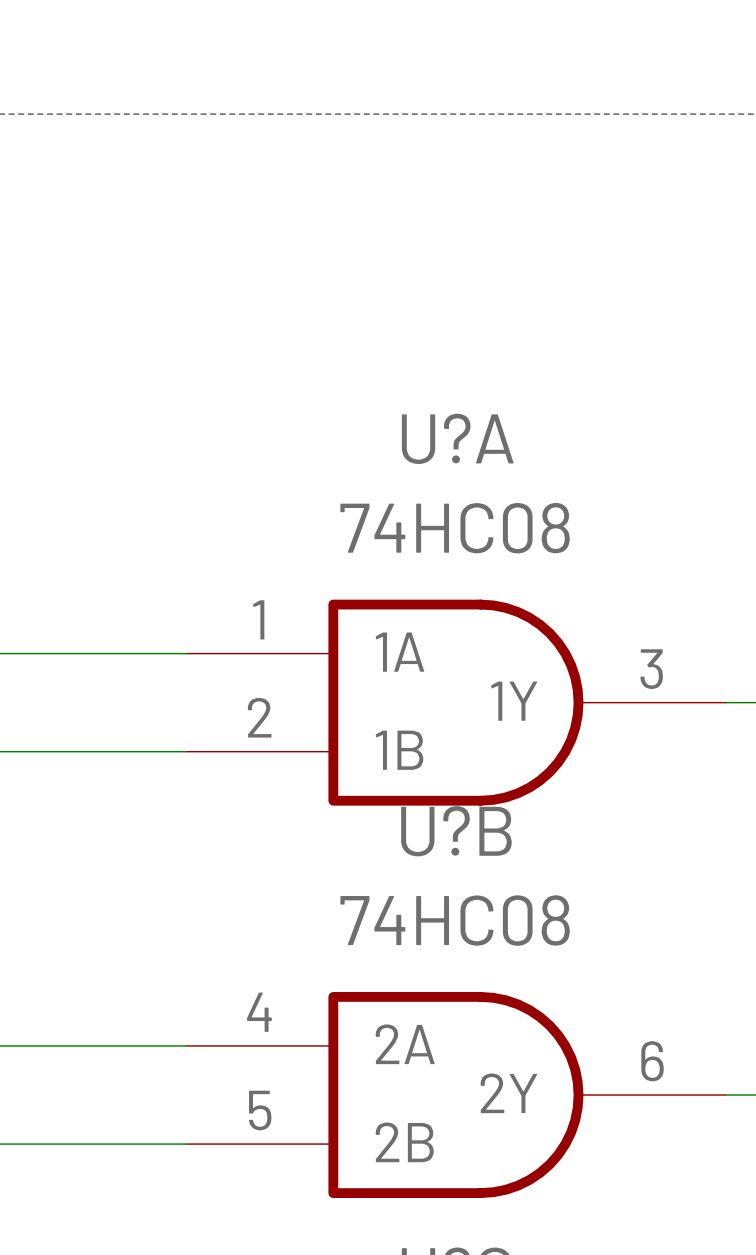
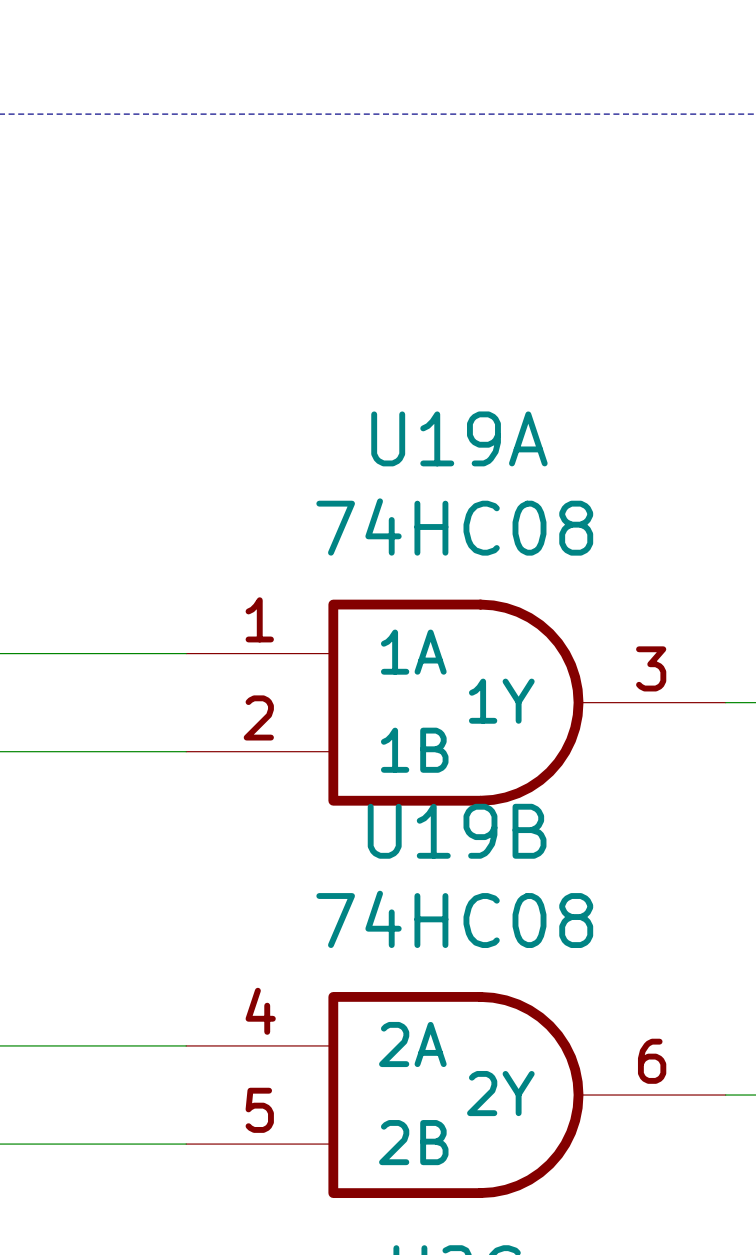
U?A name: U?A (457, 438) -> U19A (459, 438)
U?B name: U?B (456, 831) -> U19B (457, 831)

